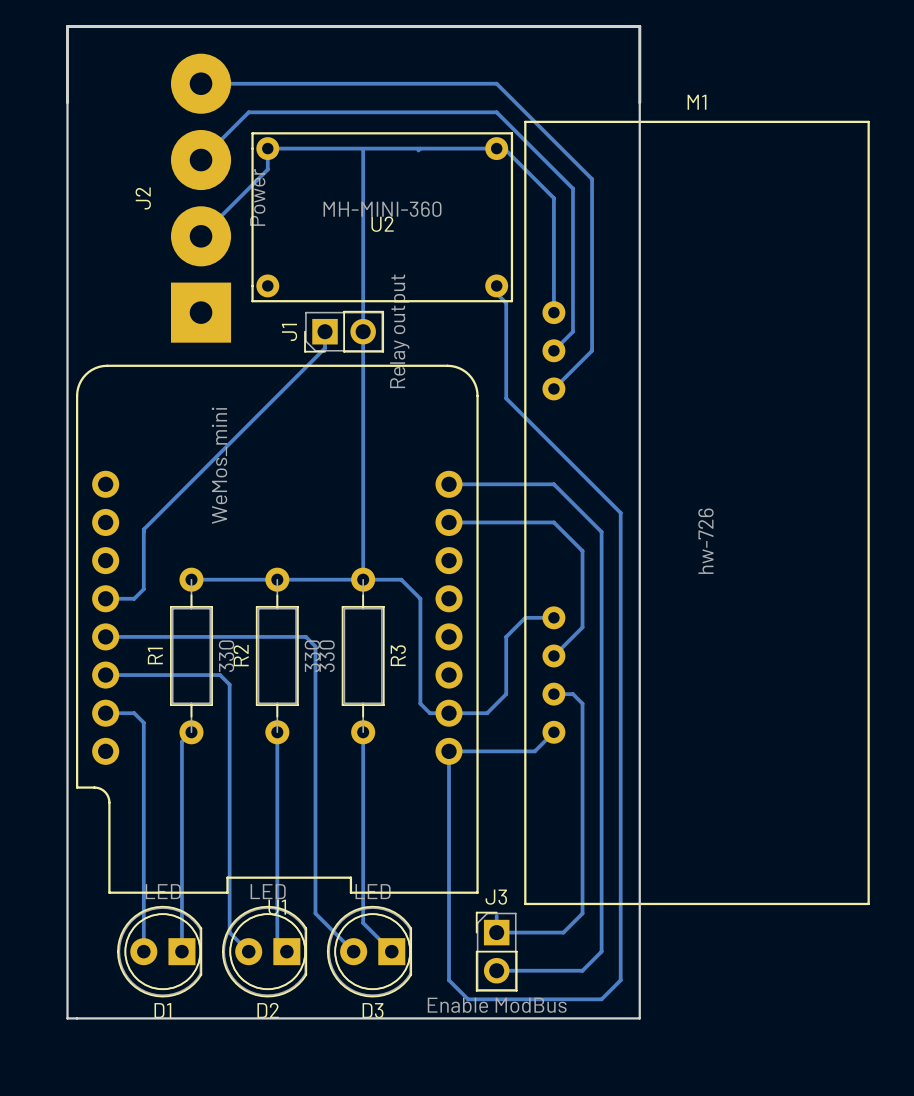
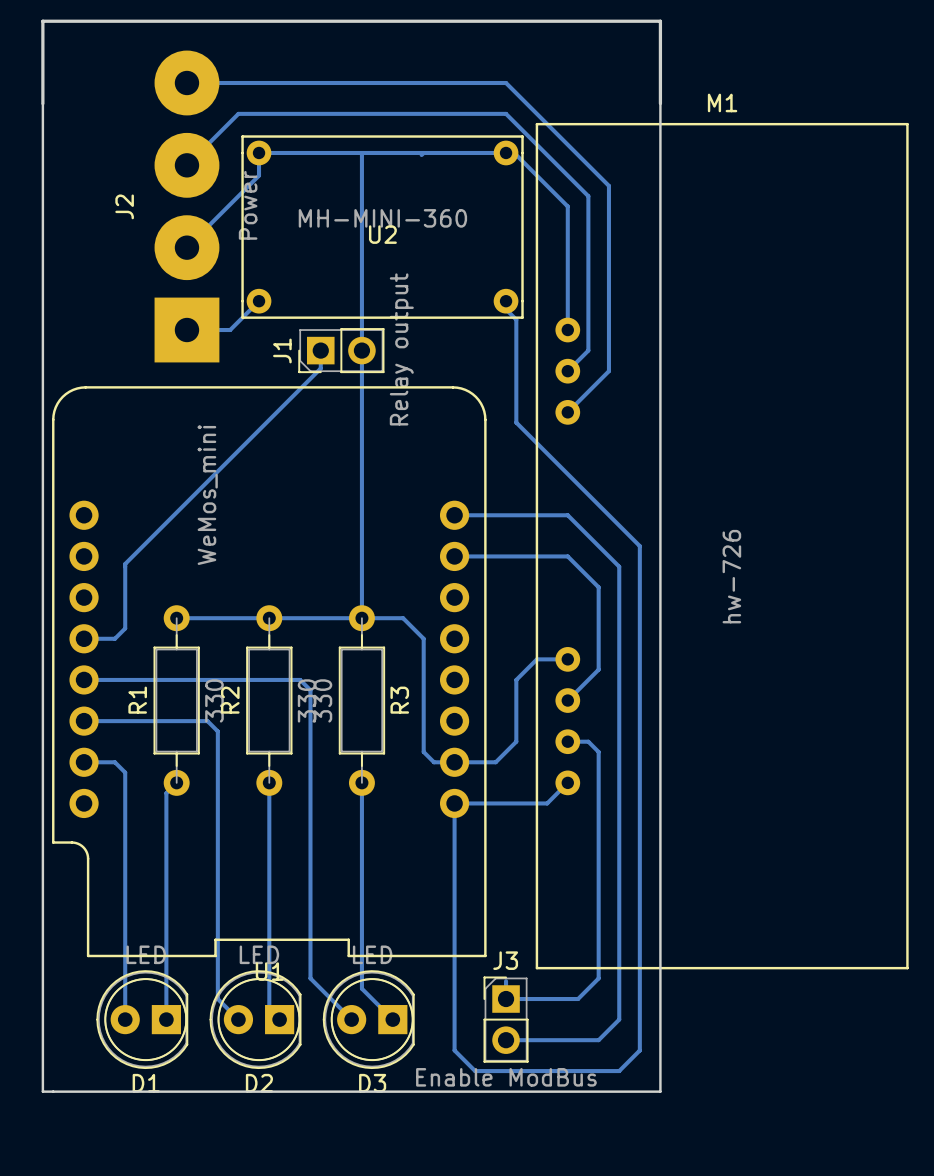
bottom track: none -> (259, 301) (230, 330) (186, 330)

